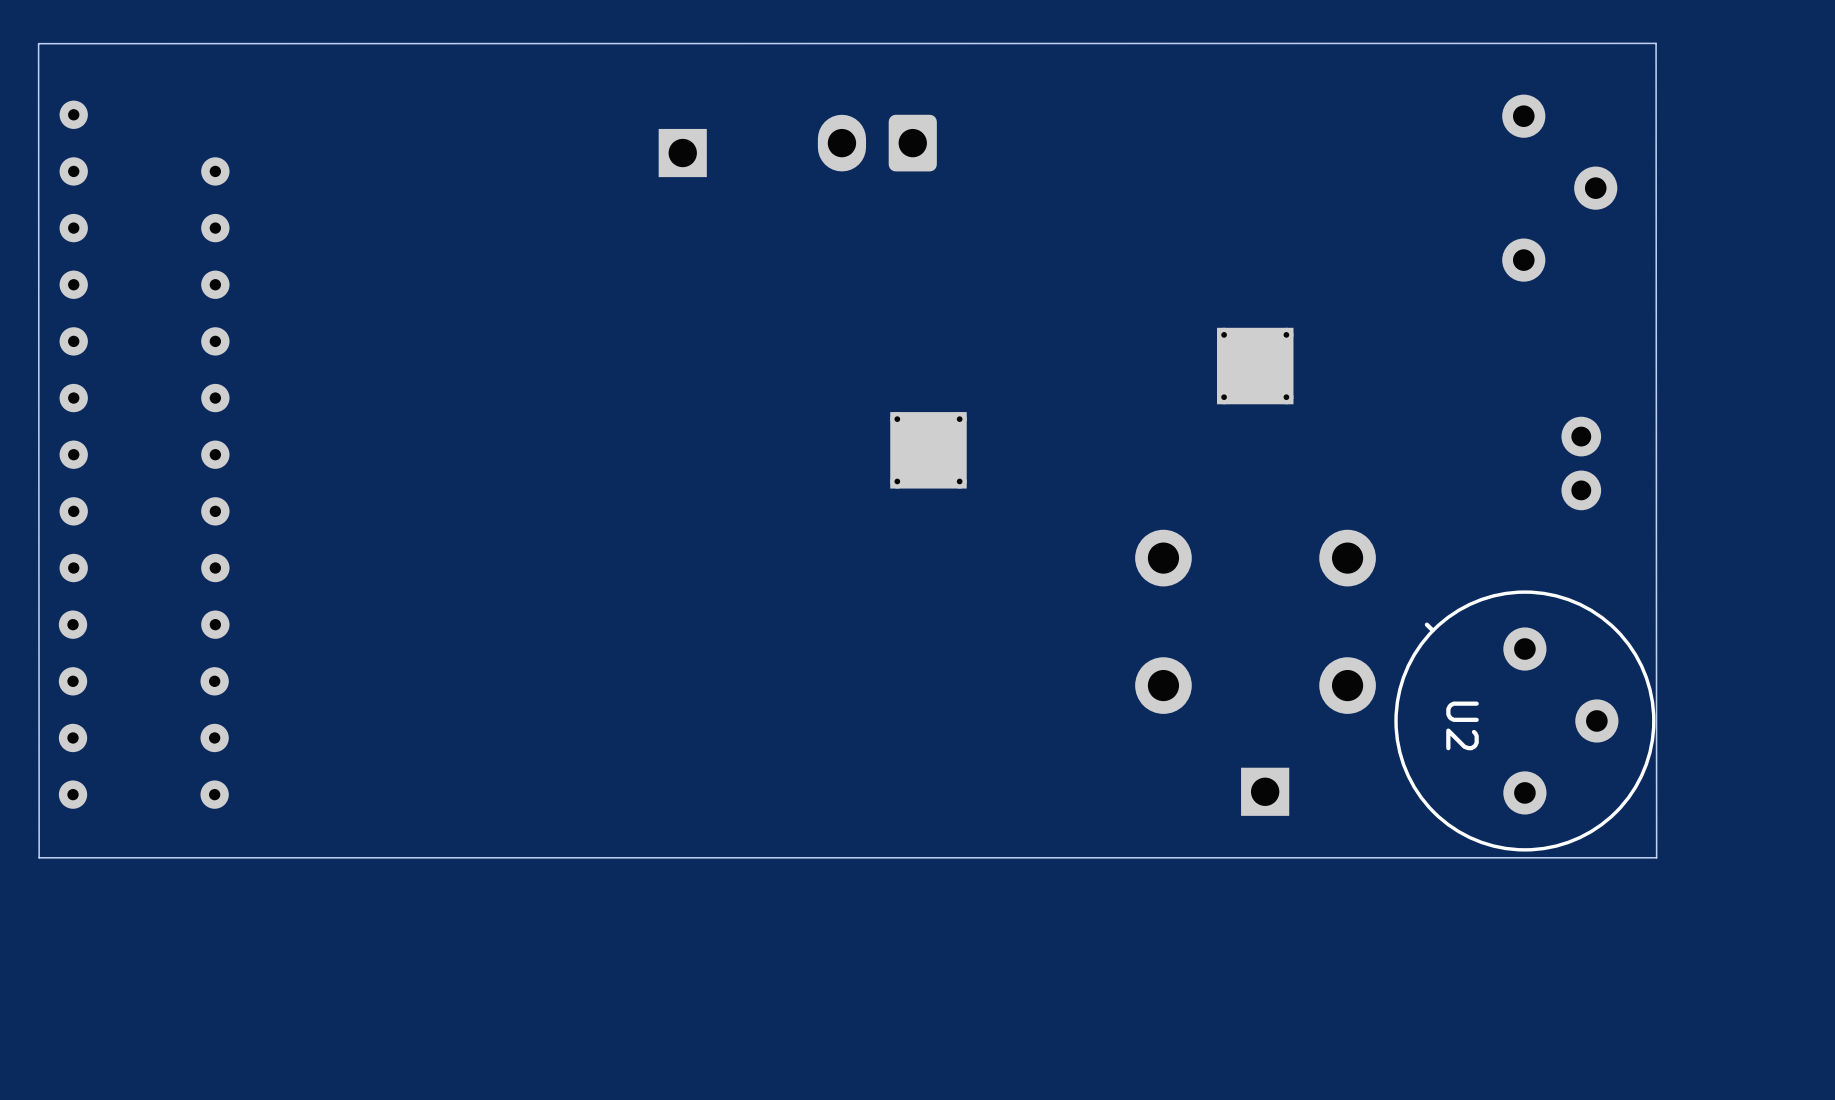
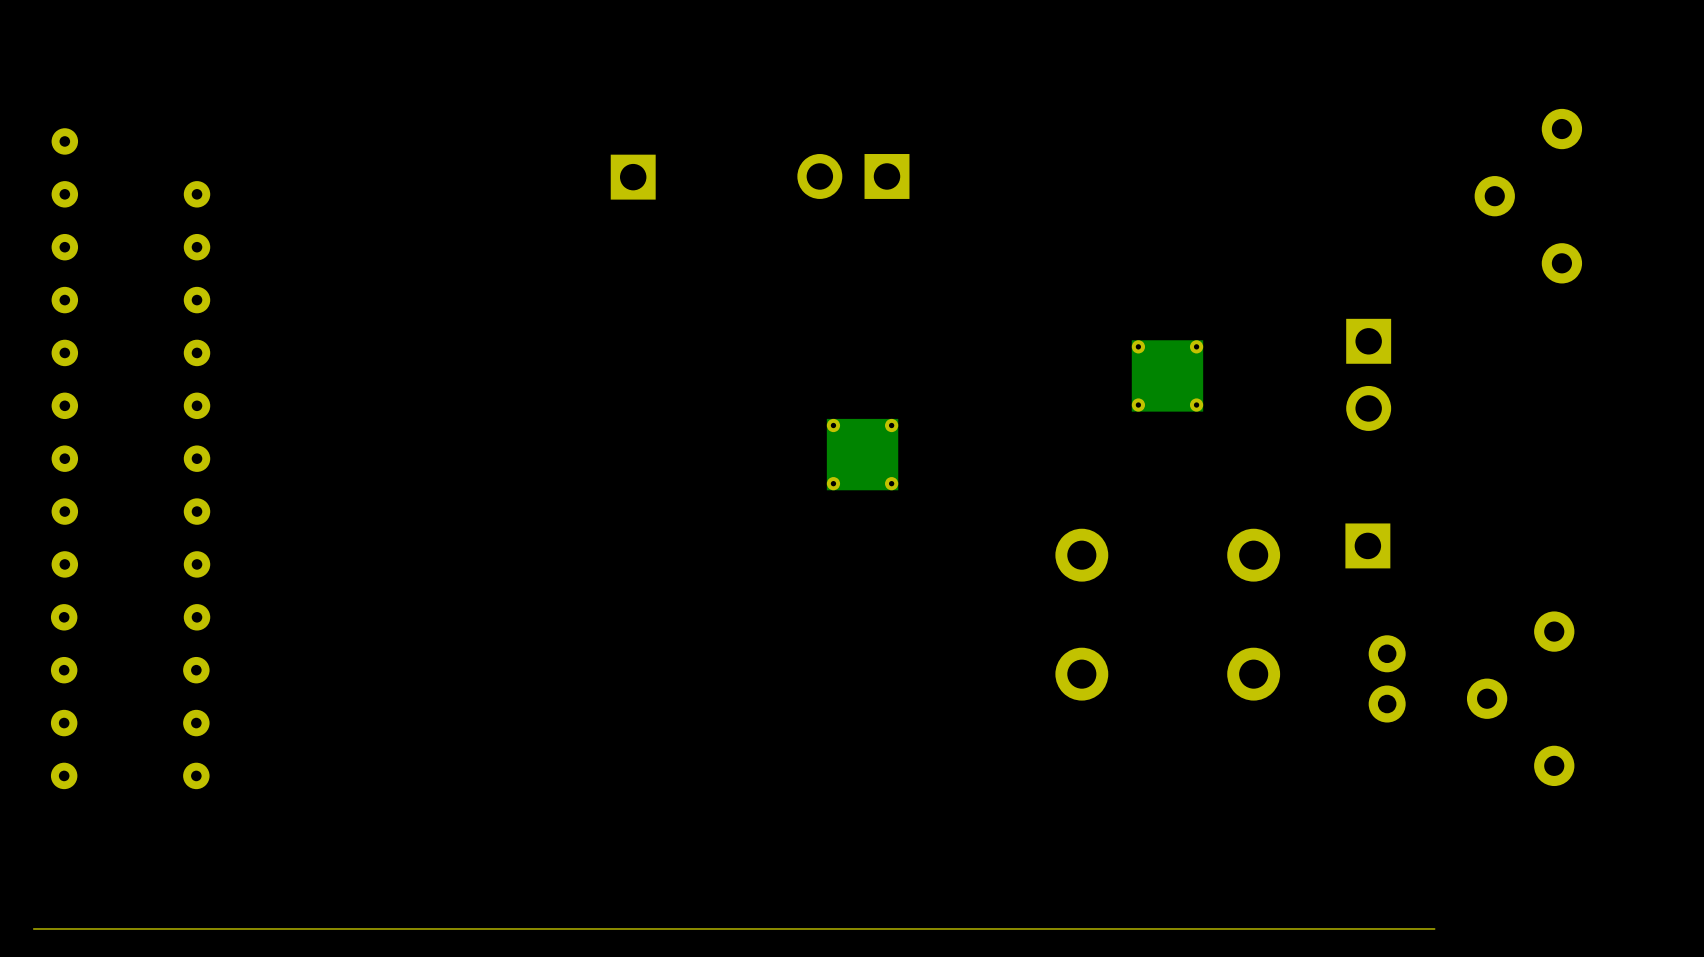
board edge: (1656, 43) (38, 43) (39, 857) (1656, 857) (1656, 43) -> none
part: (877, 143) -> none
part: none -> (853, 176)
part rotation: 0° (1559, 188) -> 180° (1528, 196)
part: none -> (1368, 374)
part position: (1581, 463) -> (1387, 678)
U2 side: bottom (1524, 720) -> top (1520, 698)
part position: (1265, 791) -> (1367, 545)
board edge: none -> (1434, 928) (33, 928)

